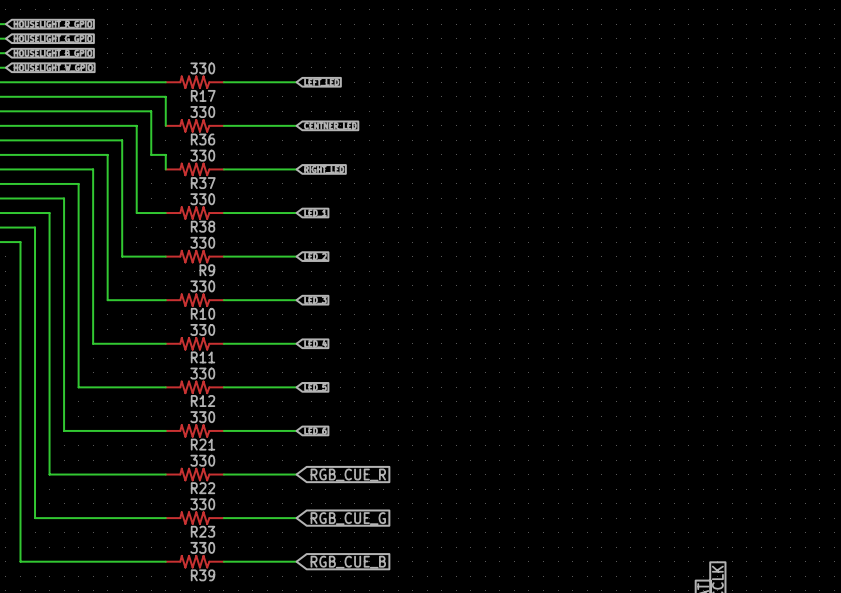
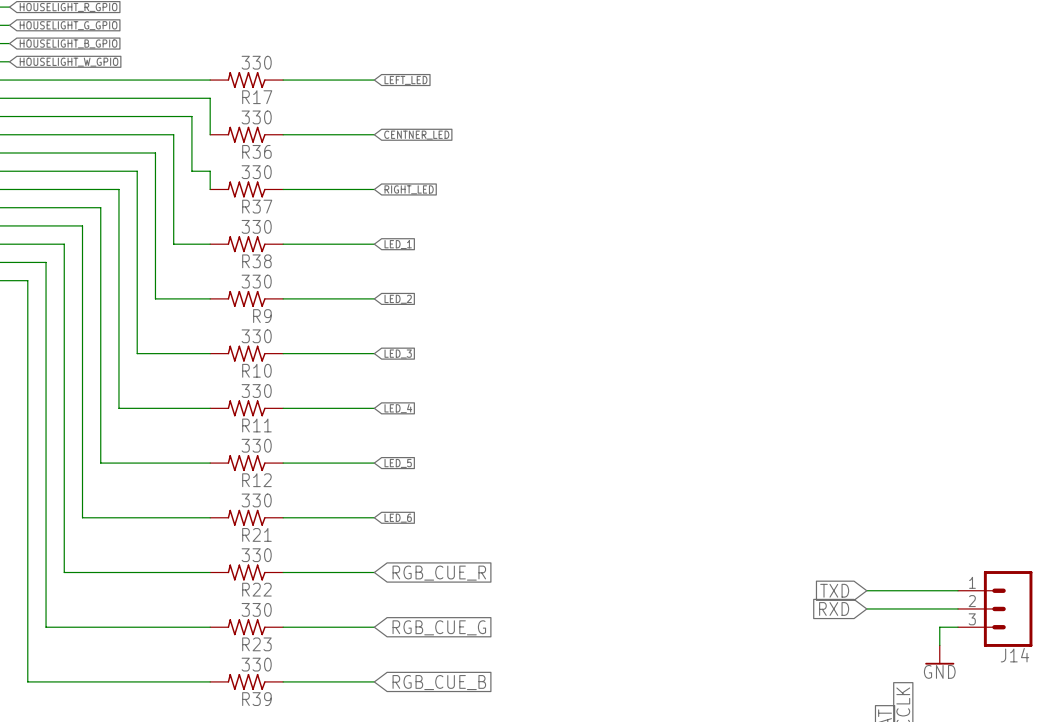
global label: none -> TXD (834, 590)
wire: none -> (866, 590) (958, 590)
global label: none -> RXD (834, 608)
wire: none -> (866, 608) (958, 608)
J14: none -> (995, 608)
wire: none -> (958, 627) (939, 627) (939, 645)
power symbol: none -> GND (939, 655)

